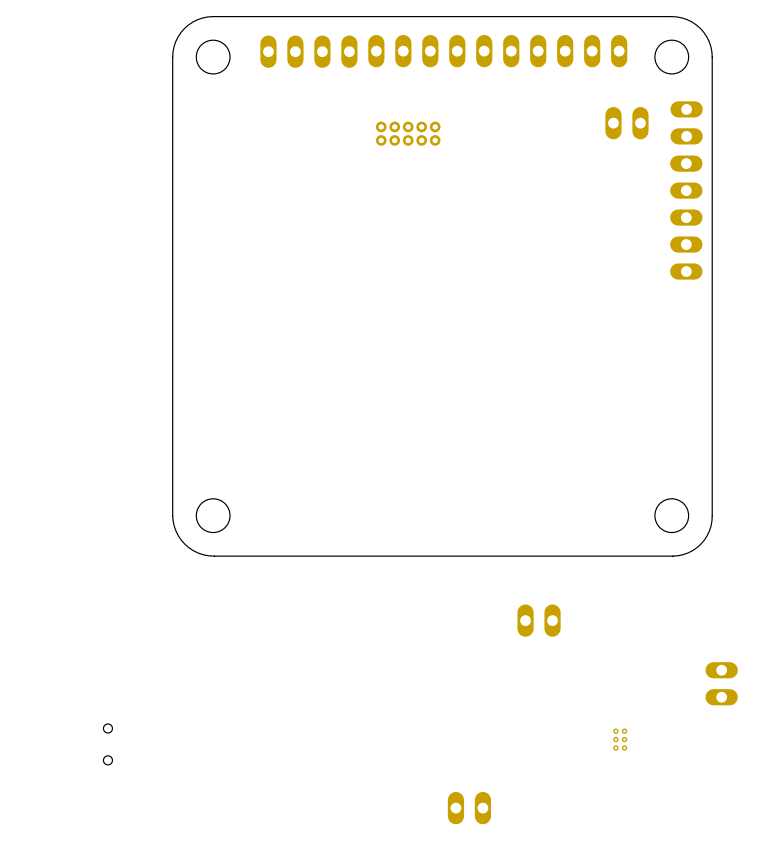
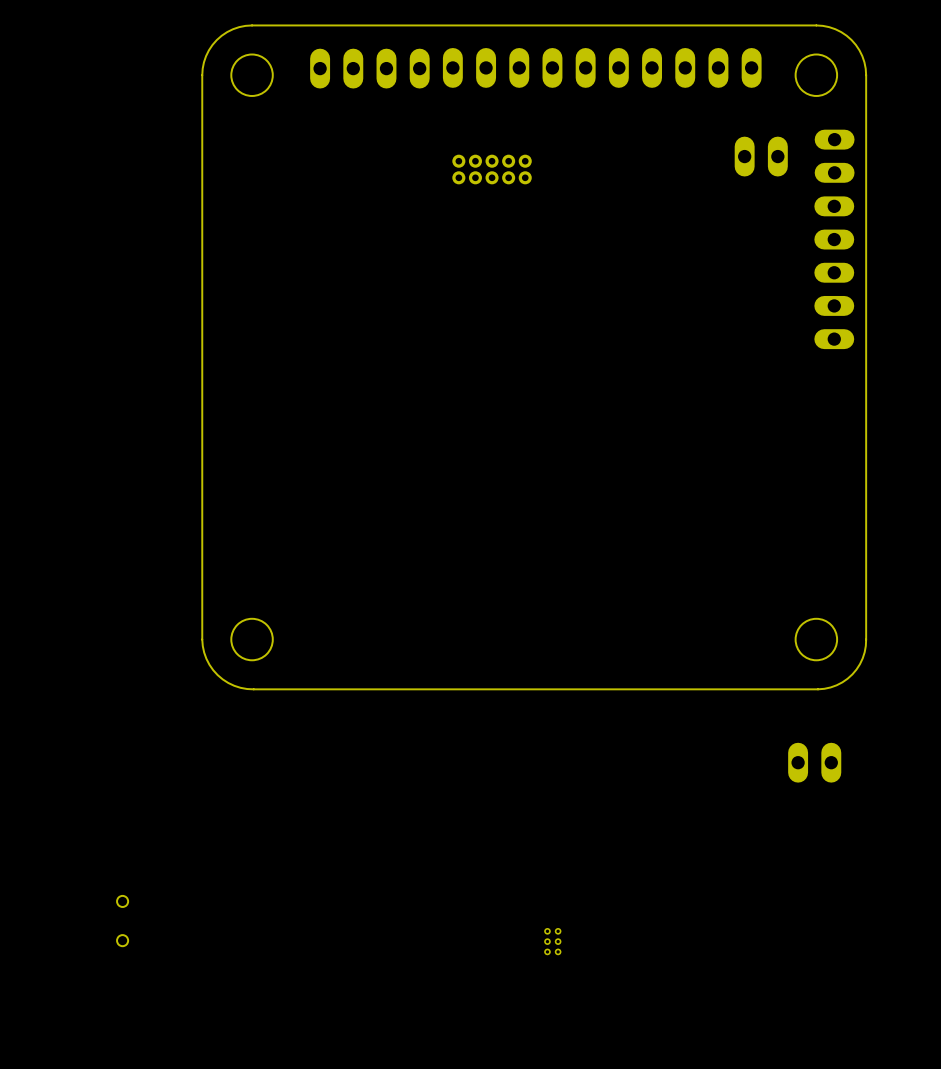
part: none -> (814, 762)
part: (539, 620) -> none
part: (721, 683) -> none
part position: (620, 739) -> (552, 941)
part: (469, 808) -> none

